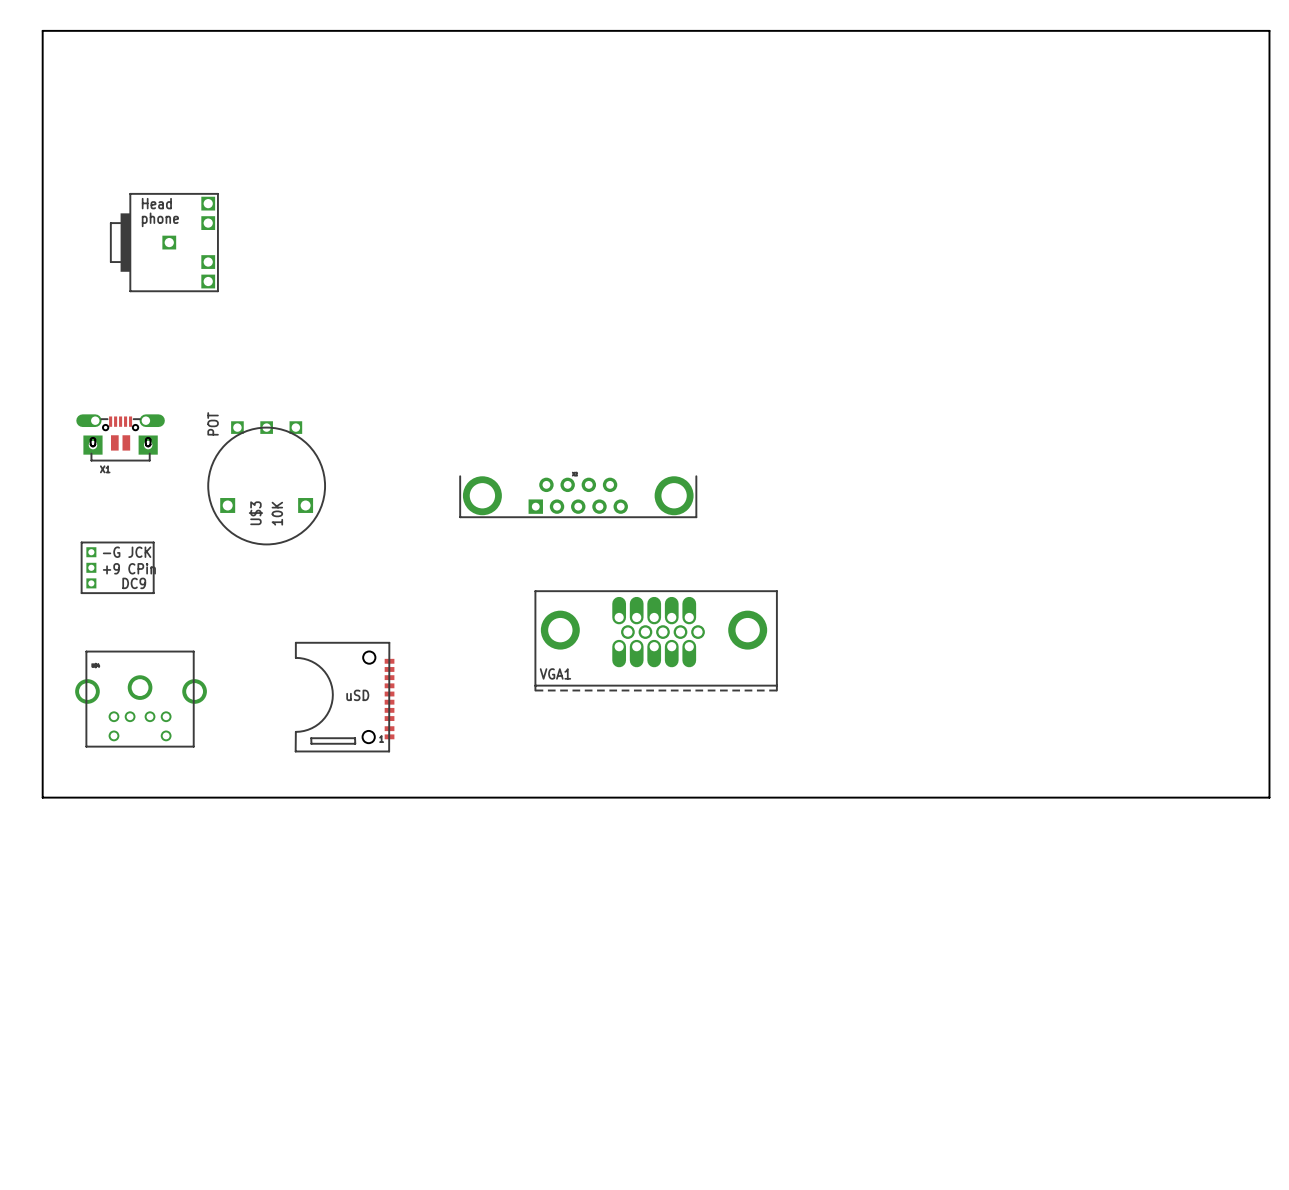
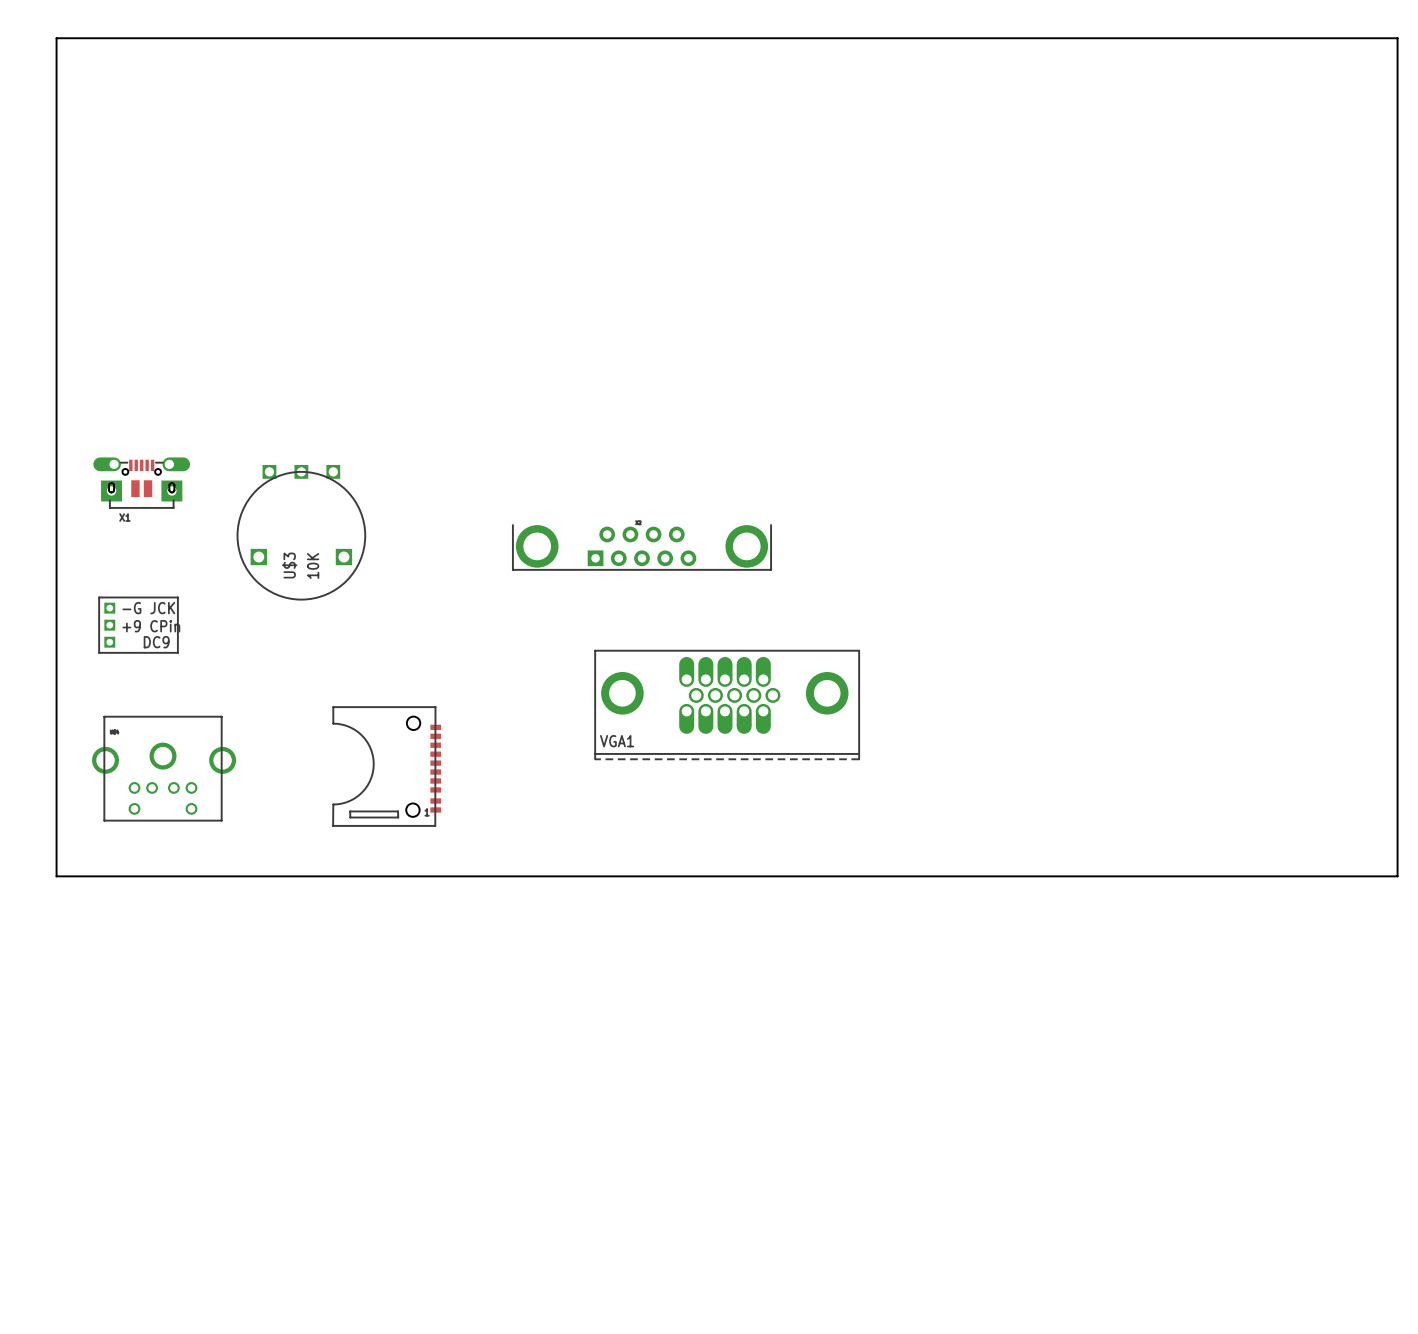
part: (164, 242) -> none
U$3 text: POT (213, 423) -> none
part text: uSD (357, 695) -> none

